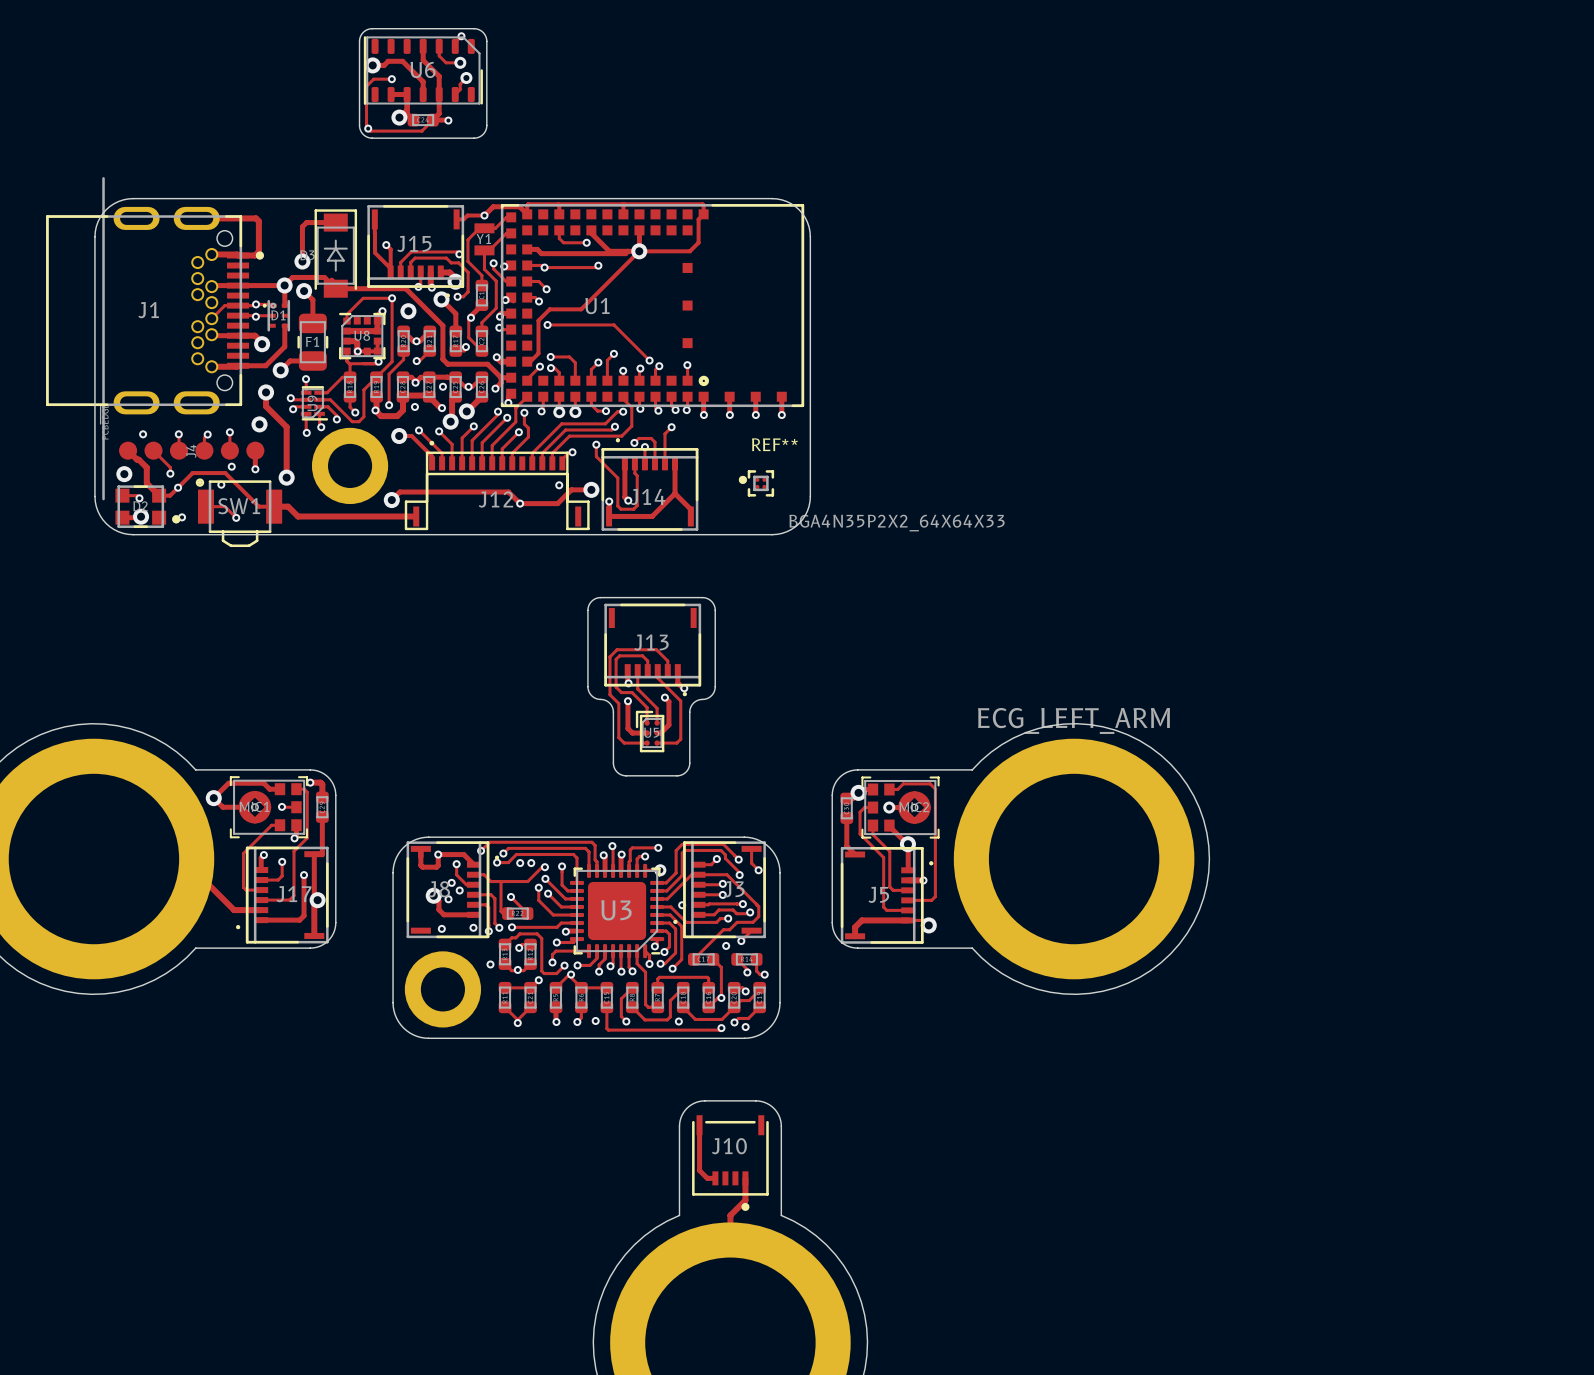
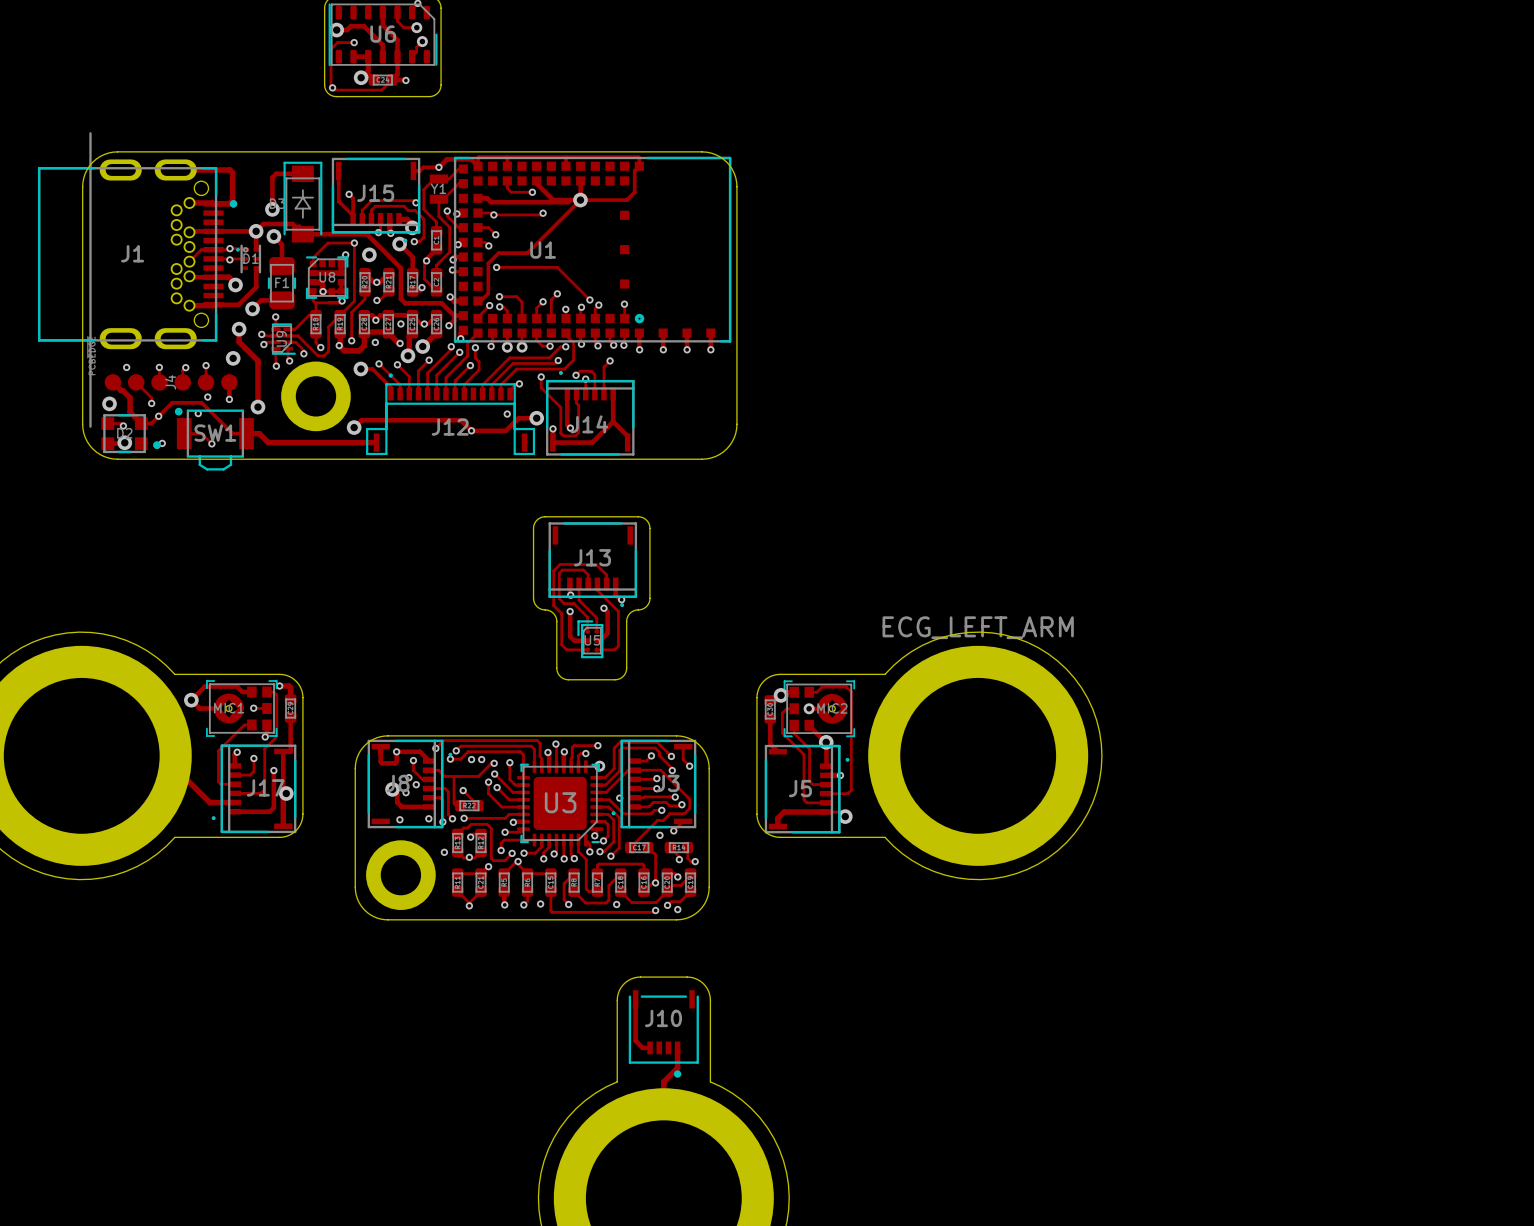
REF**: BGA4N35P2X2_64X64X33 (756, 483) -> none

